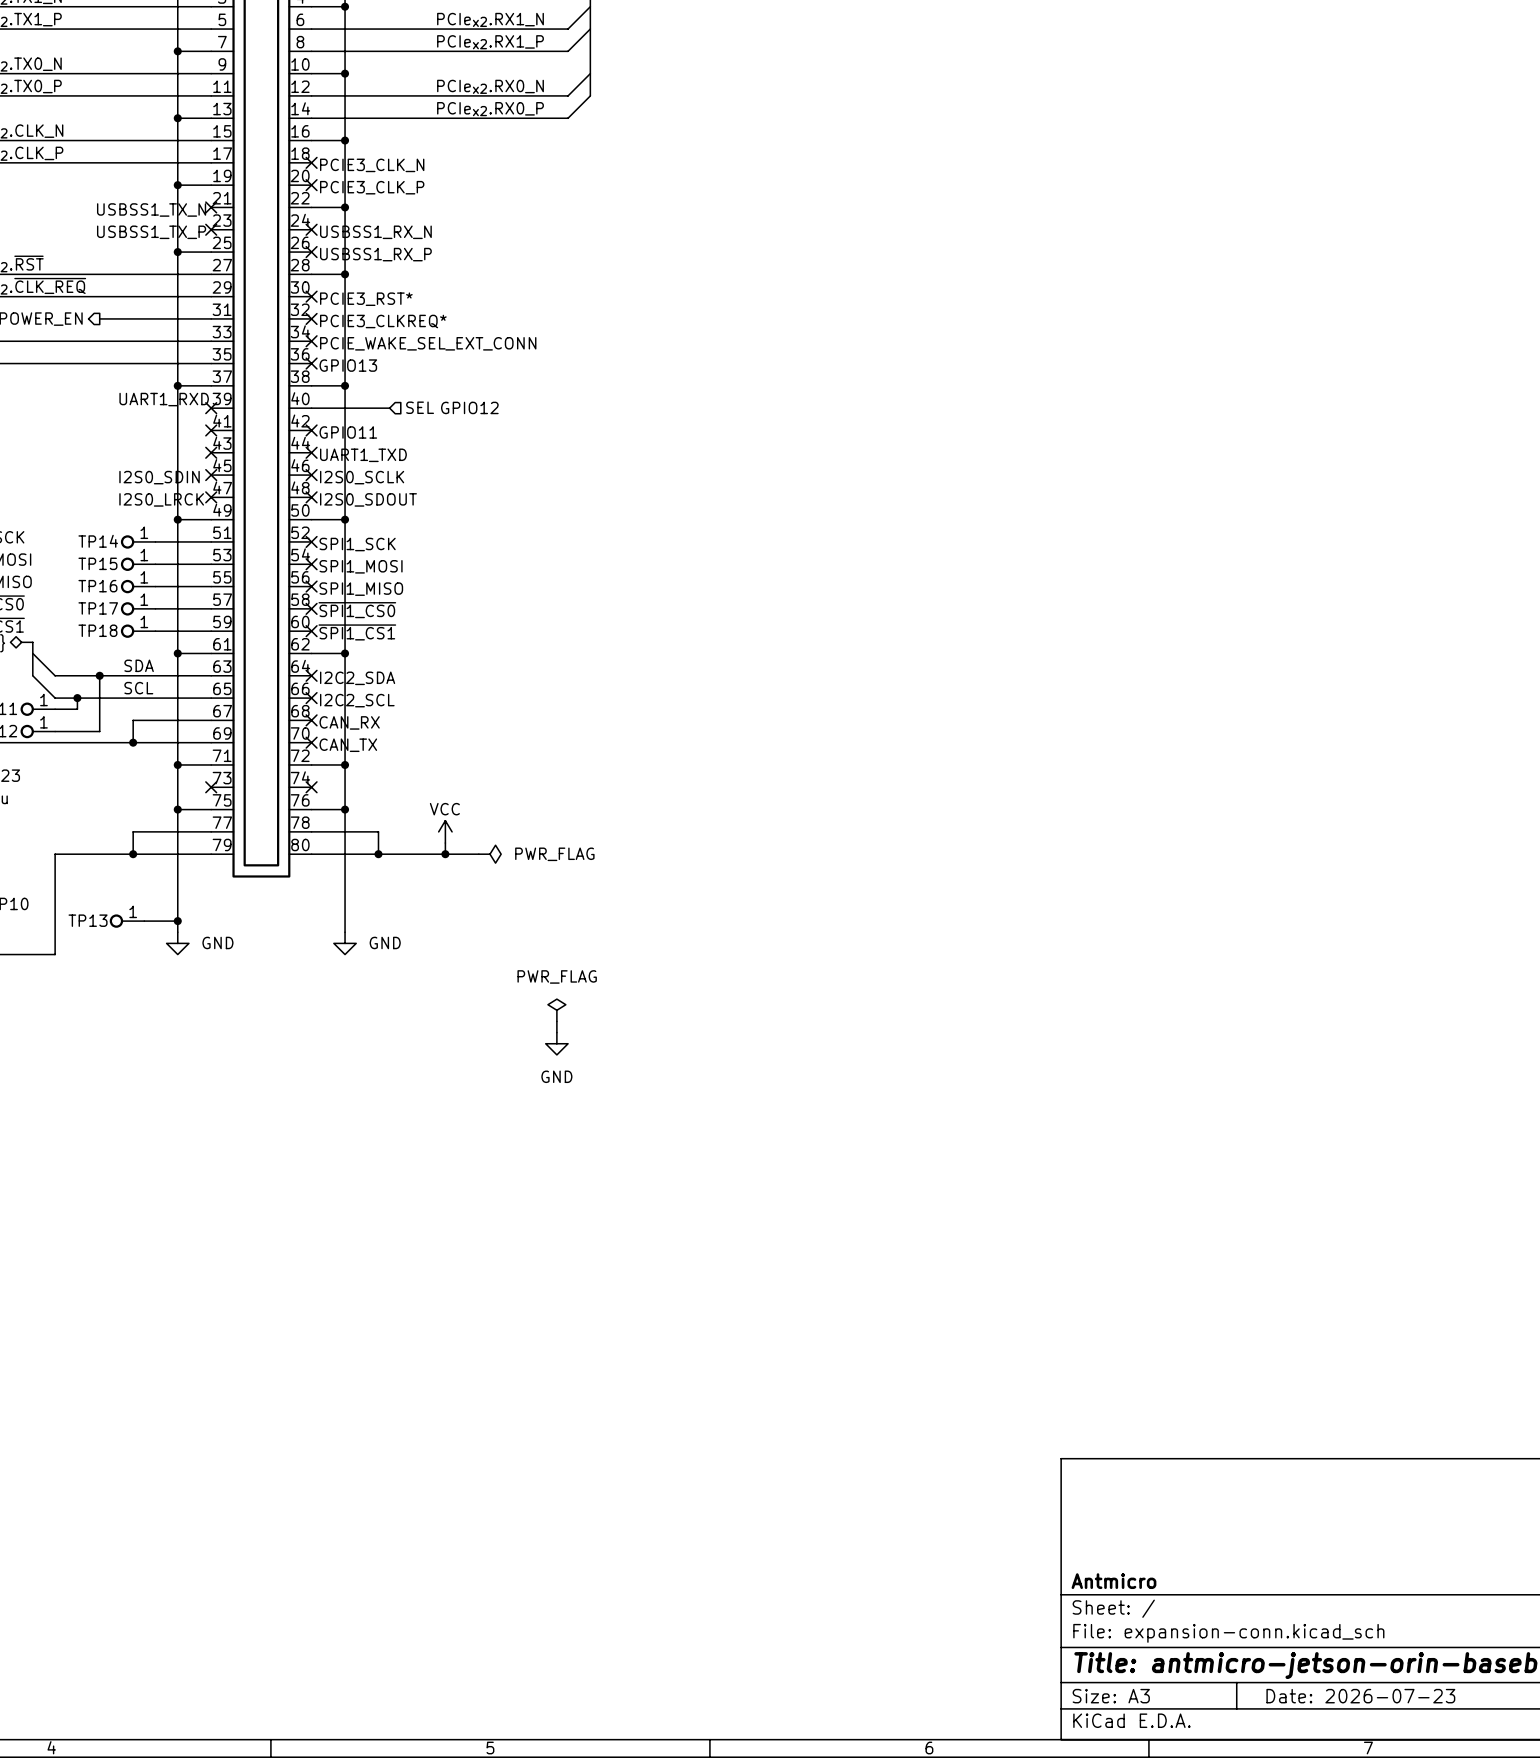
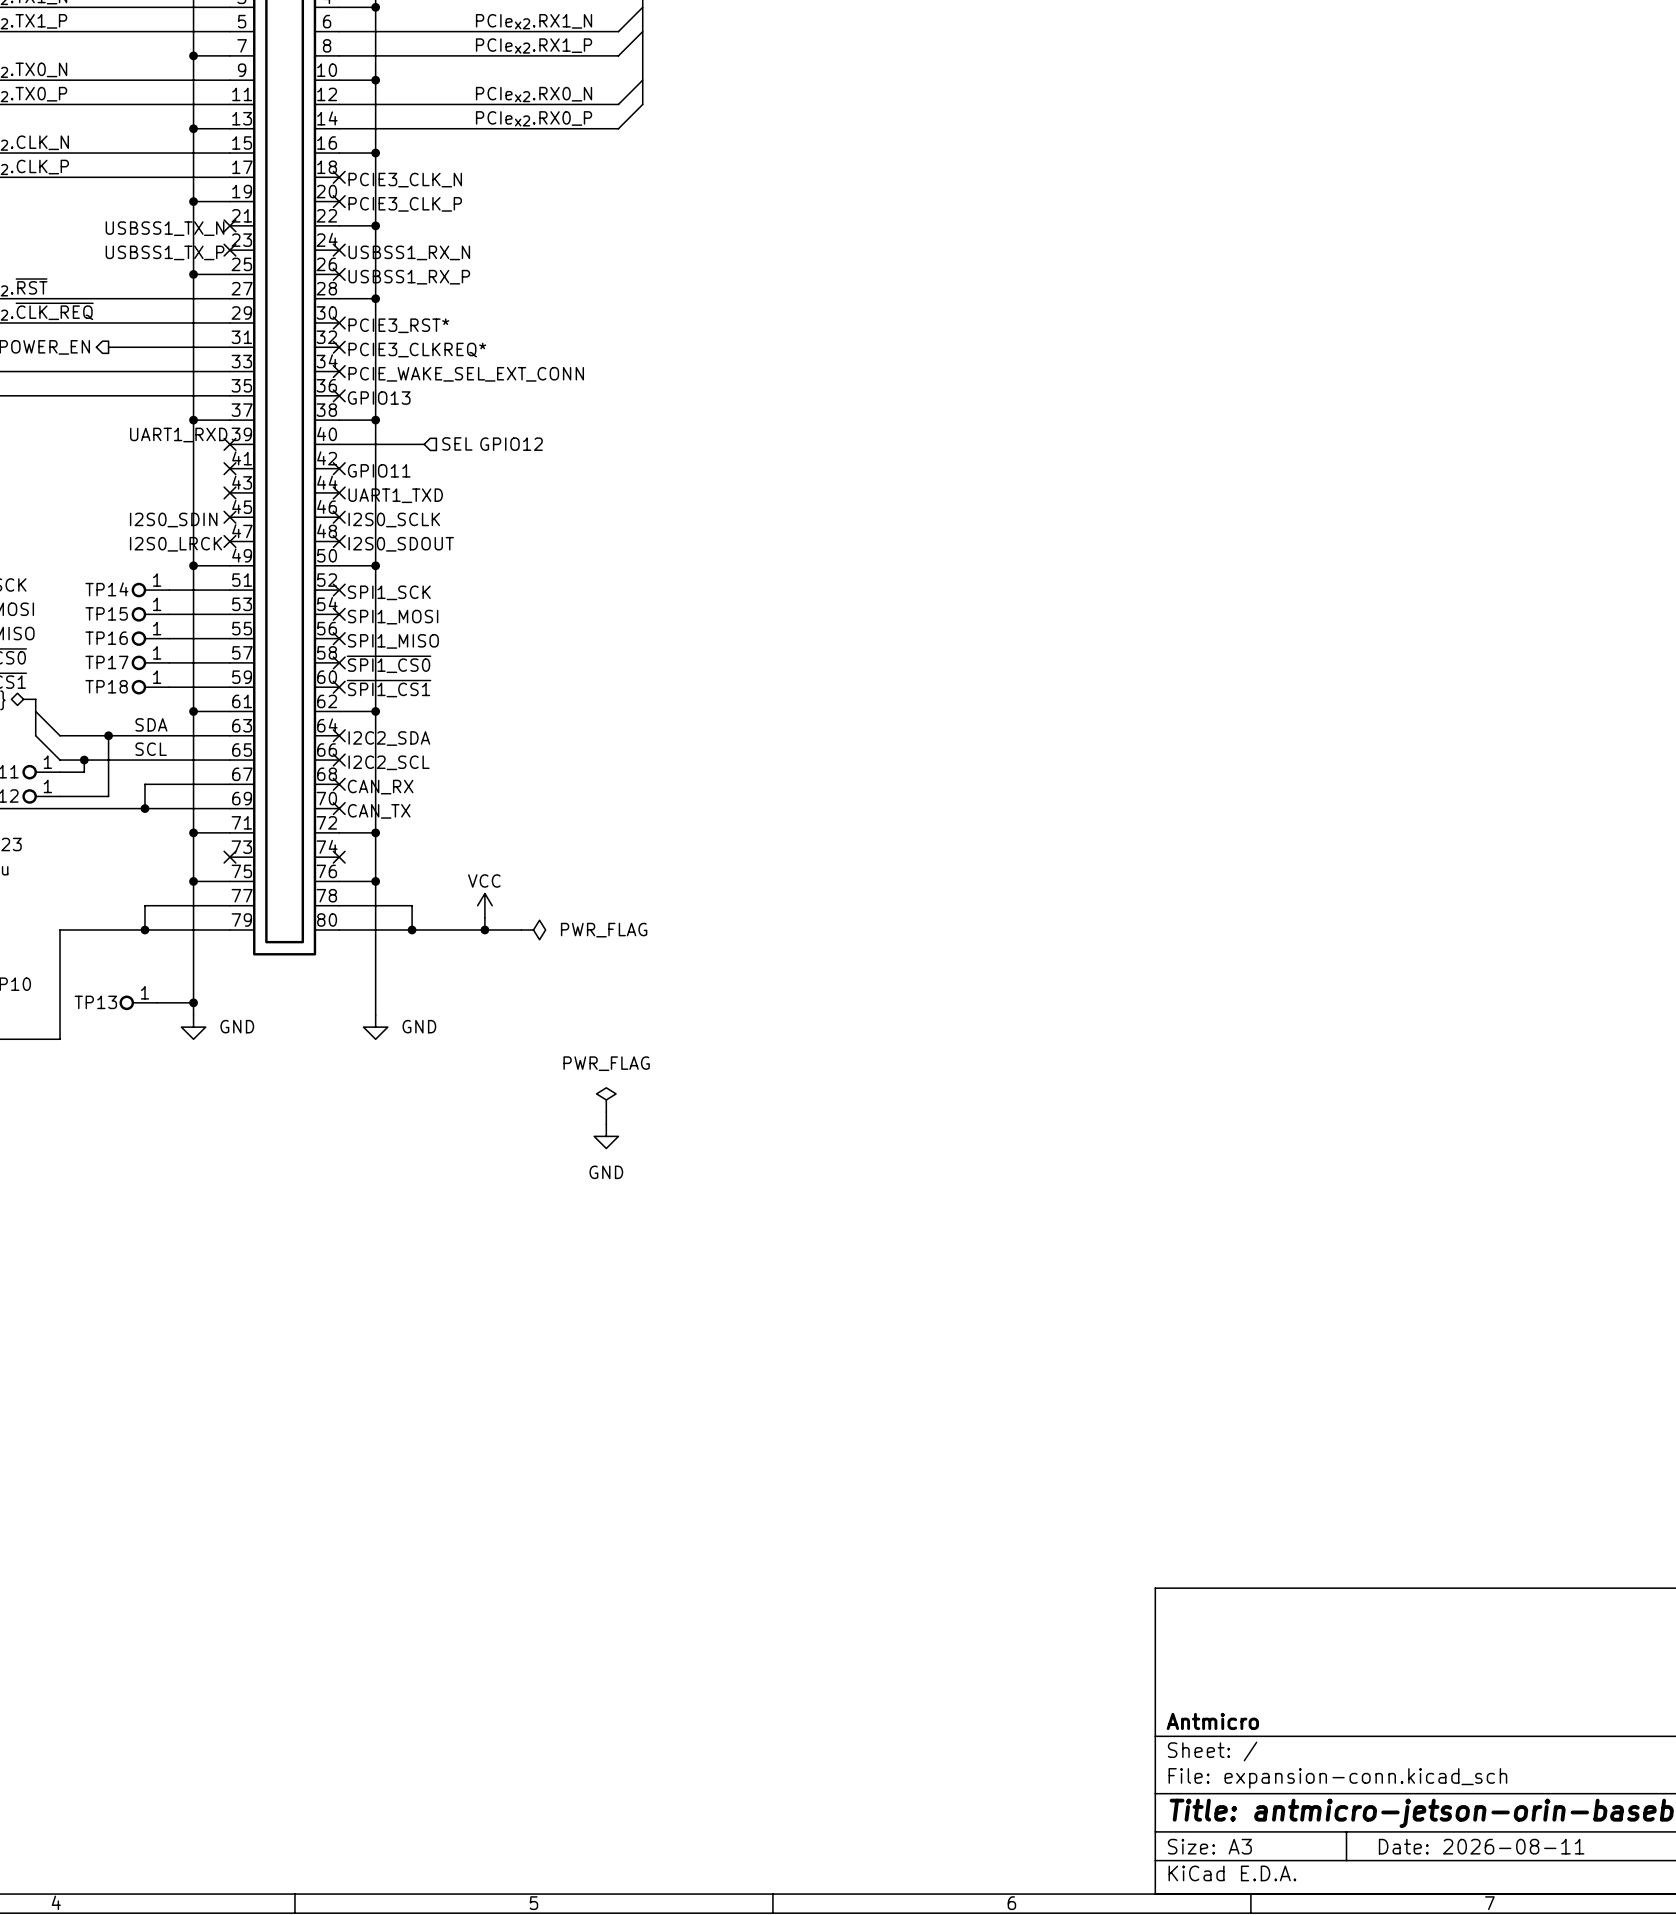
title block: Date: 2026-07-23 (1360, 1696) -> Date: 2026-08-11 (1481, 1846)

